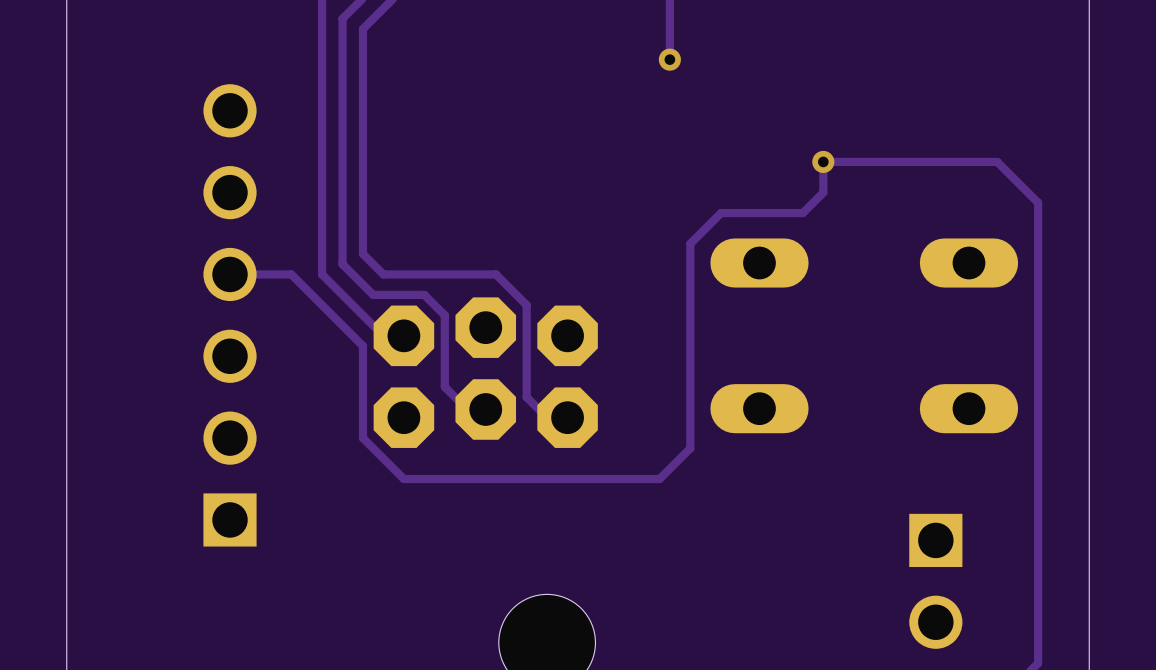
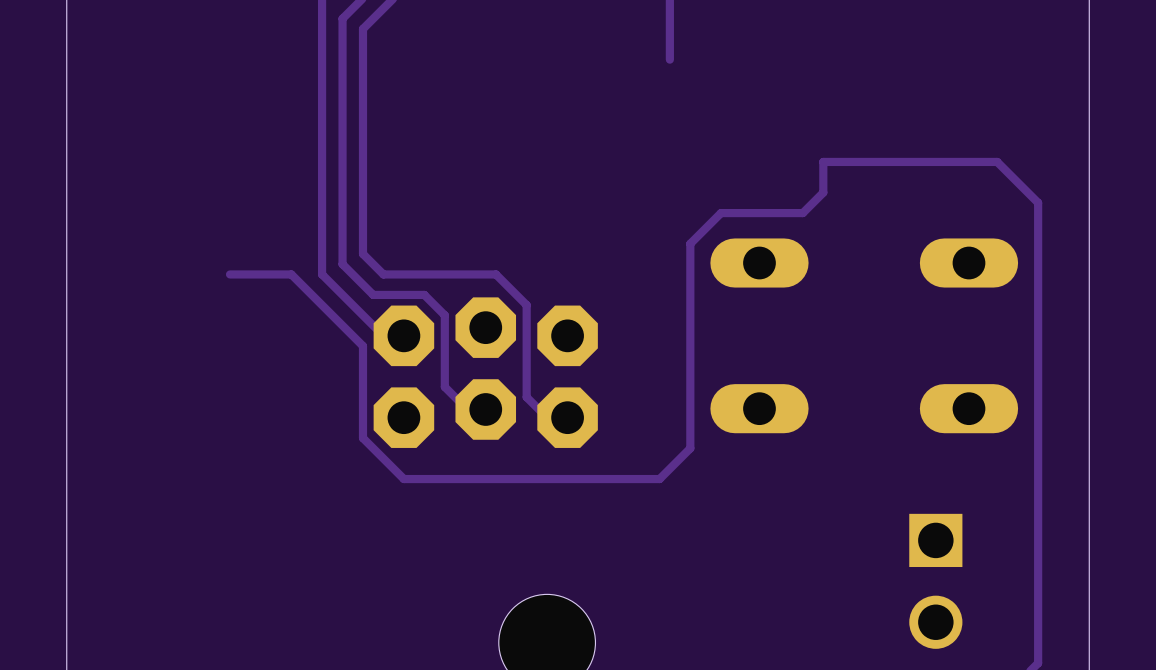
via: (669, 59) -> none
via: (823, 161) -> none
part: (230, 315) -> none

